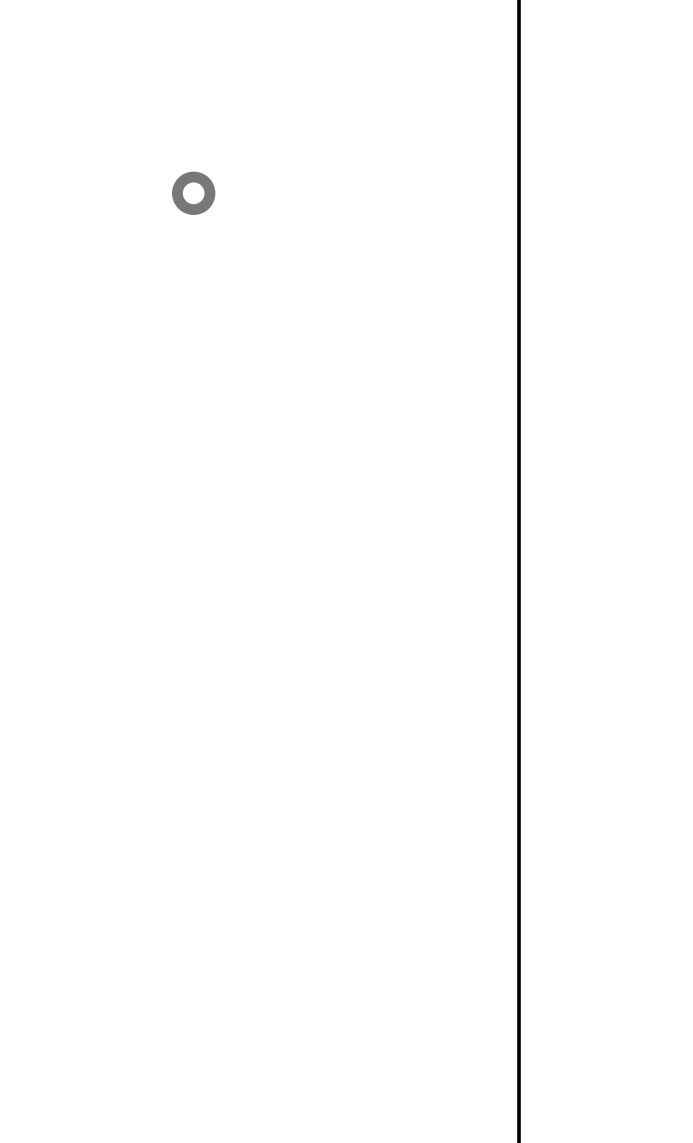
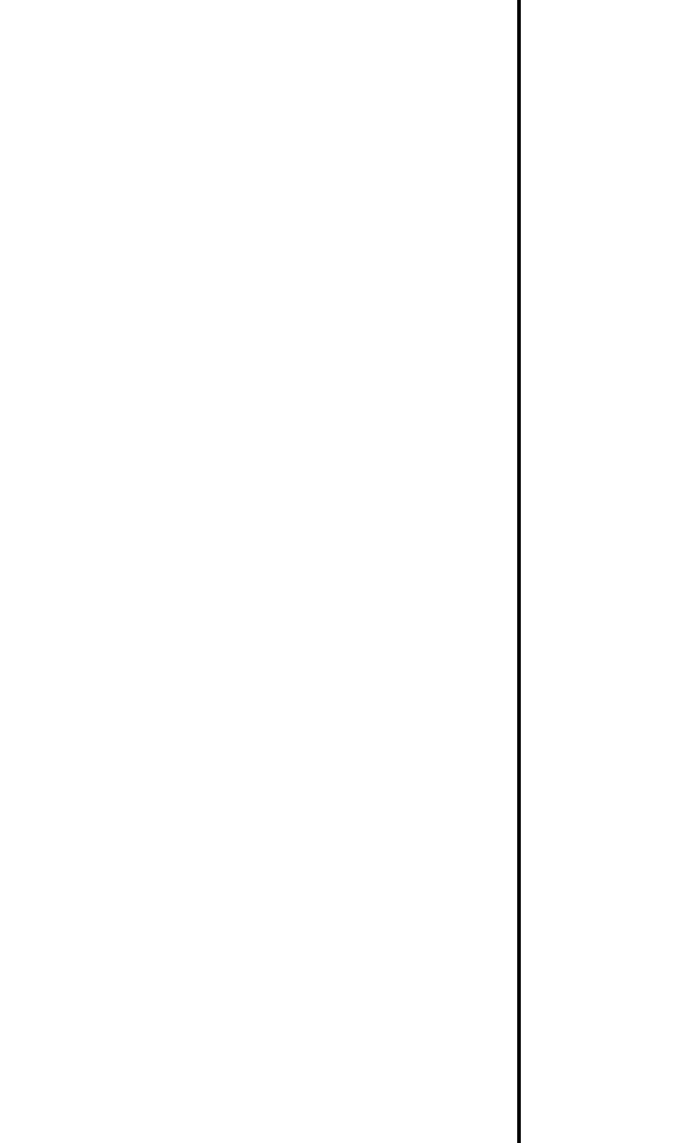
via: (193, 193) -> none

